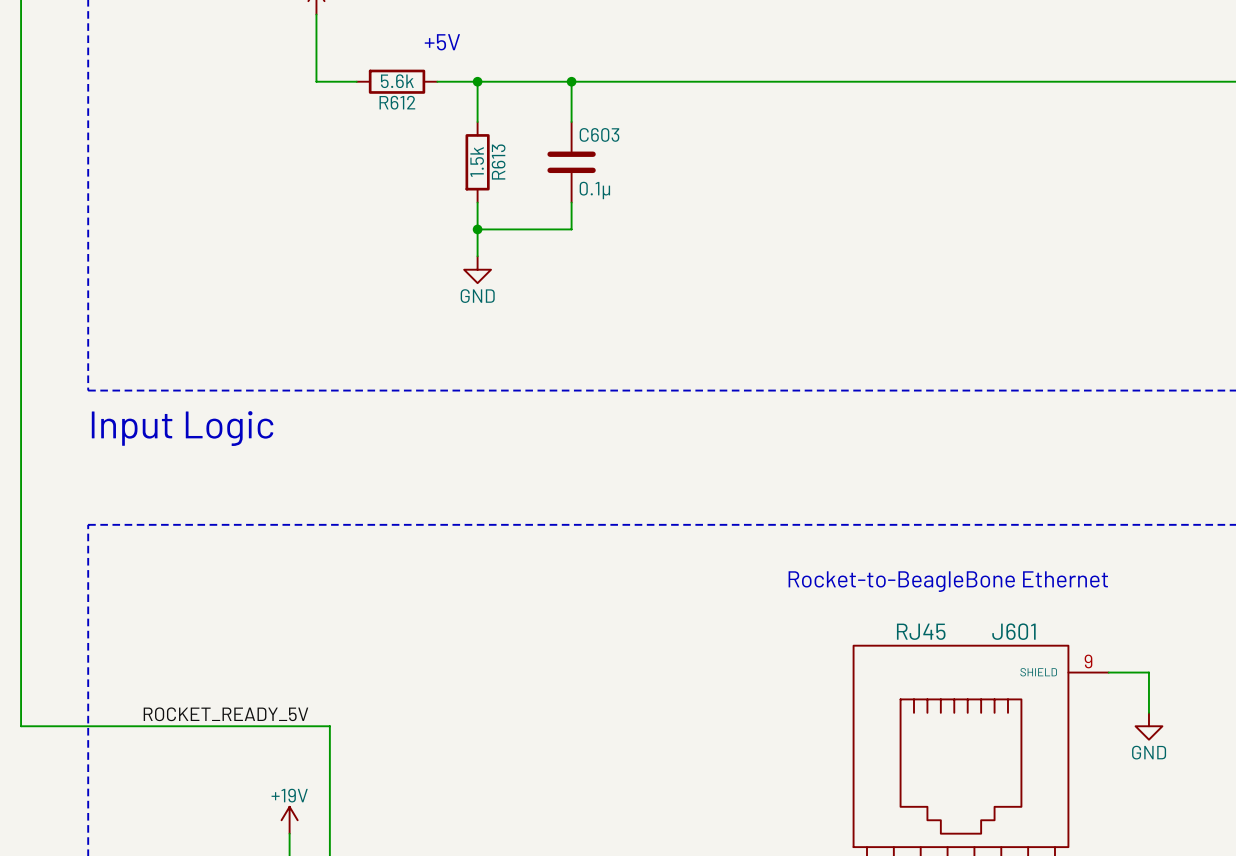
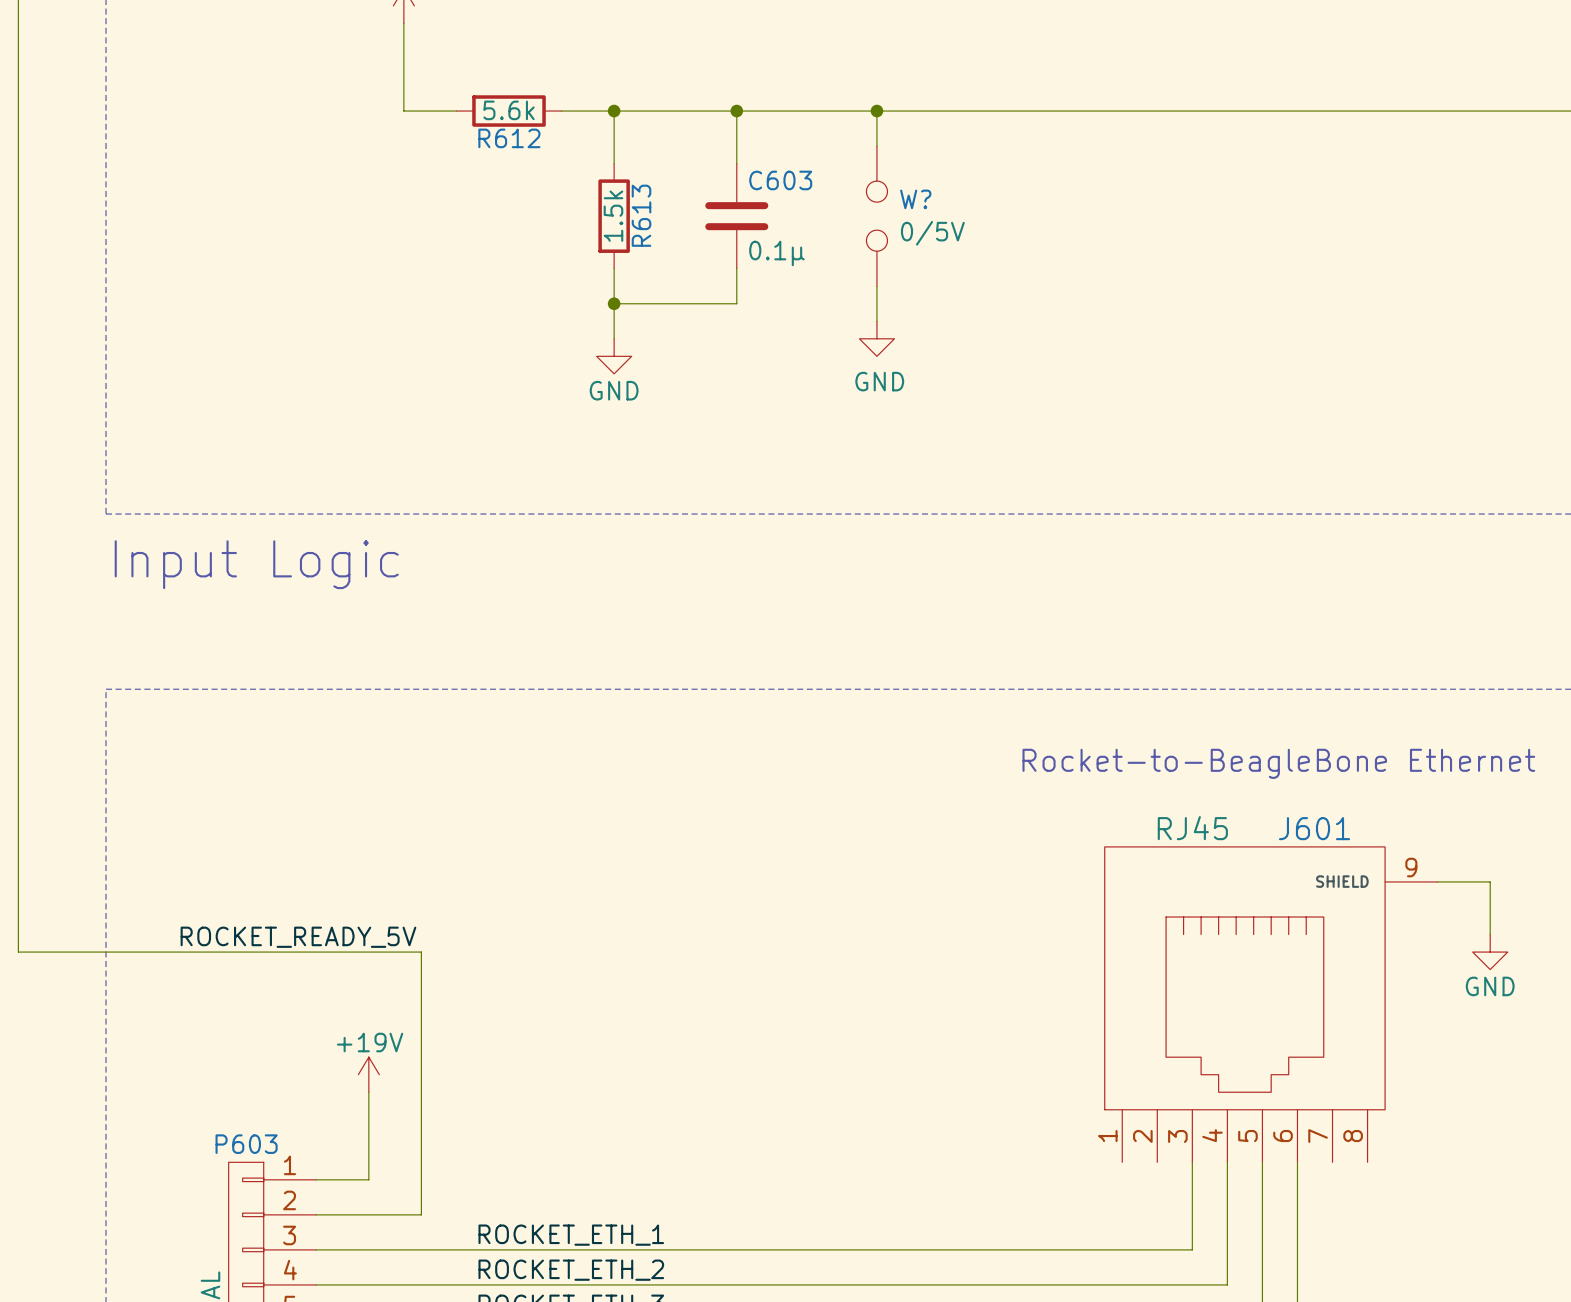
text: +5V (442, 42) -> none
wire: none -> (876, 111) (876, 146)
junction: none -> (876, 111)
W?: none -> 0/5V (876, 216)
wire: none -> (876, 286) (876, 321)
power symbol: none -> GND (876, 338)

